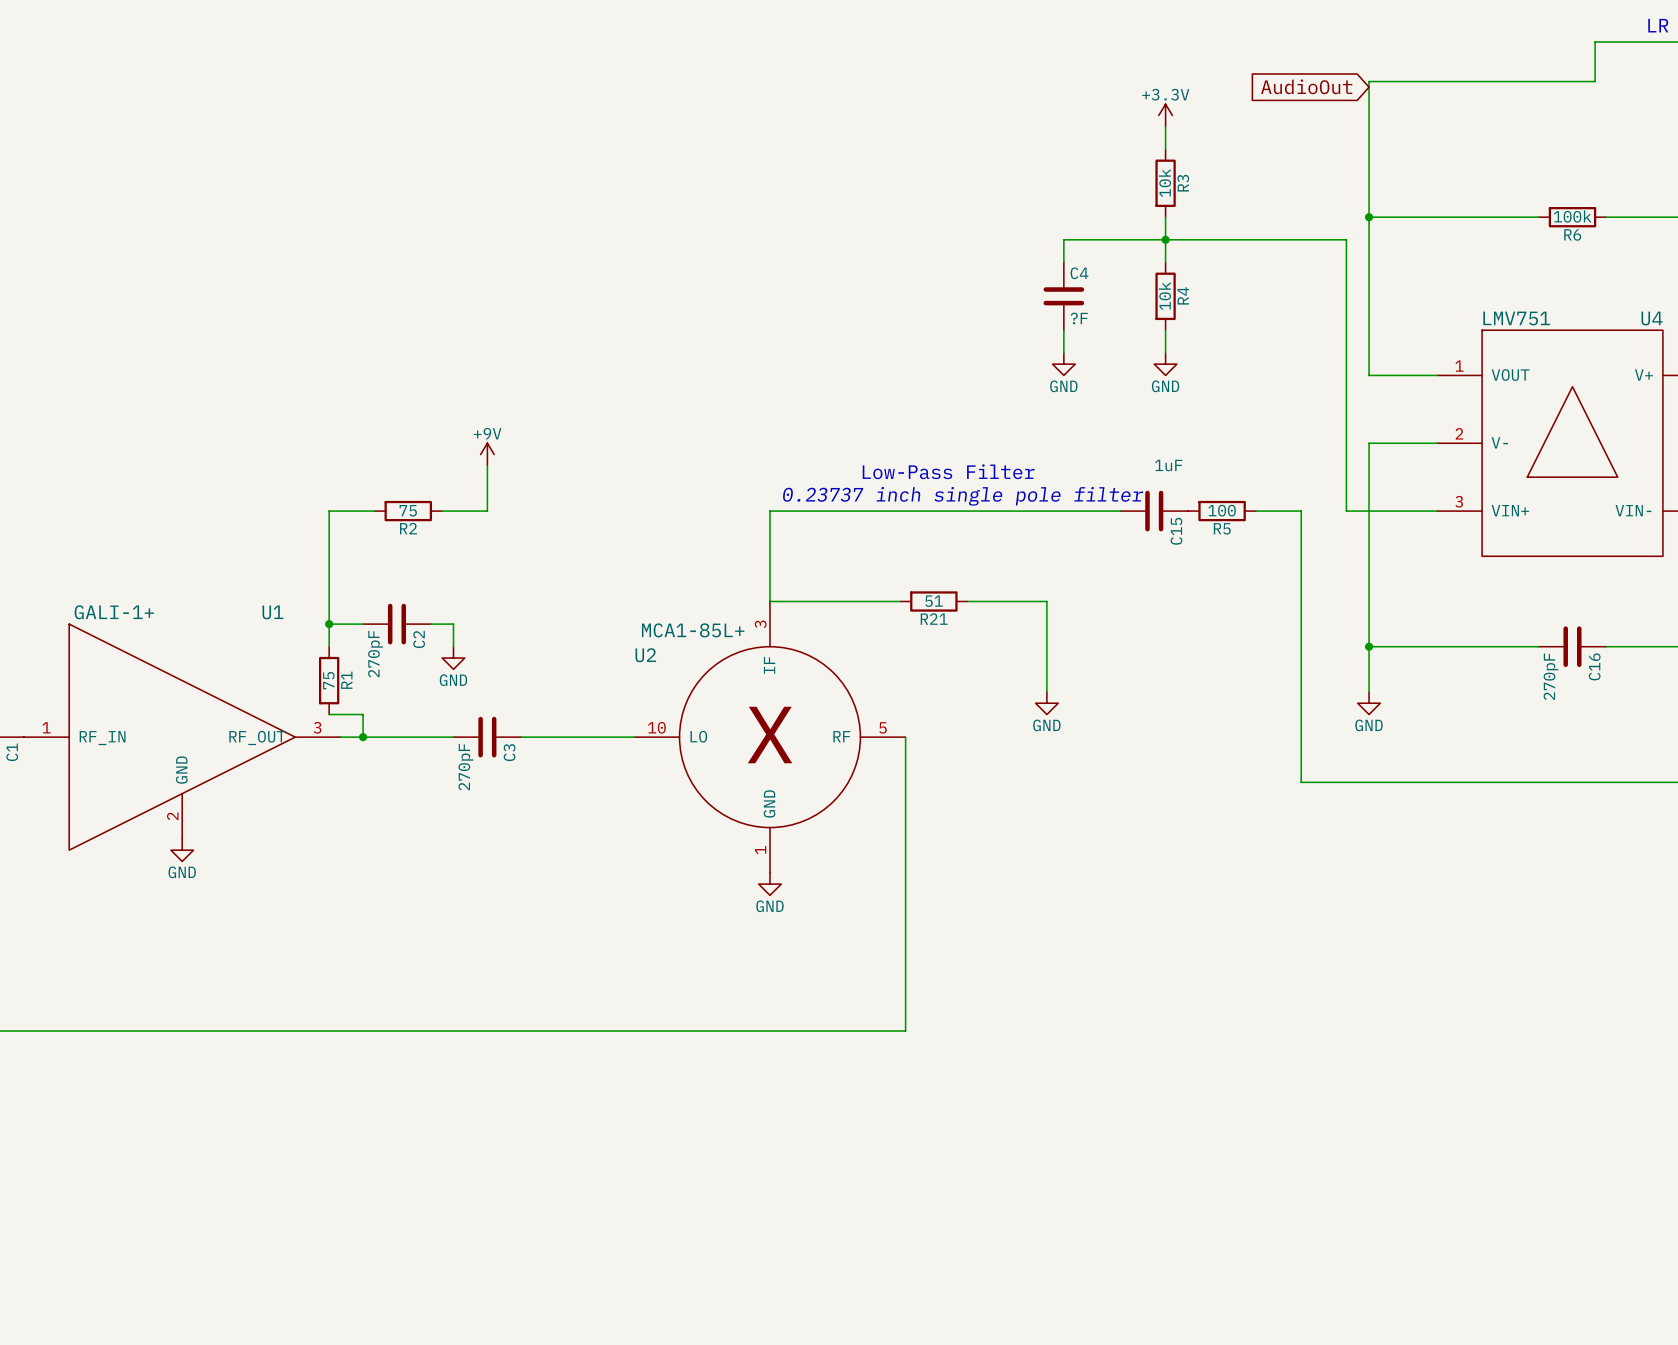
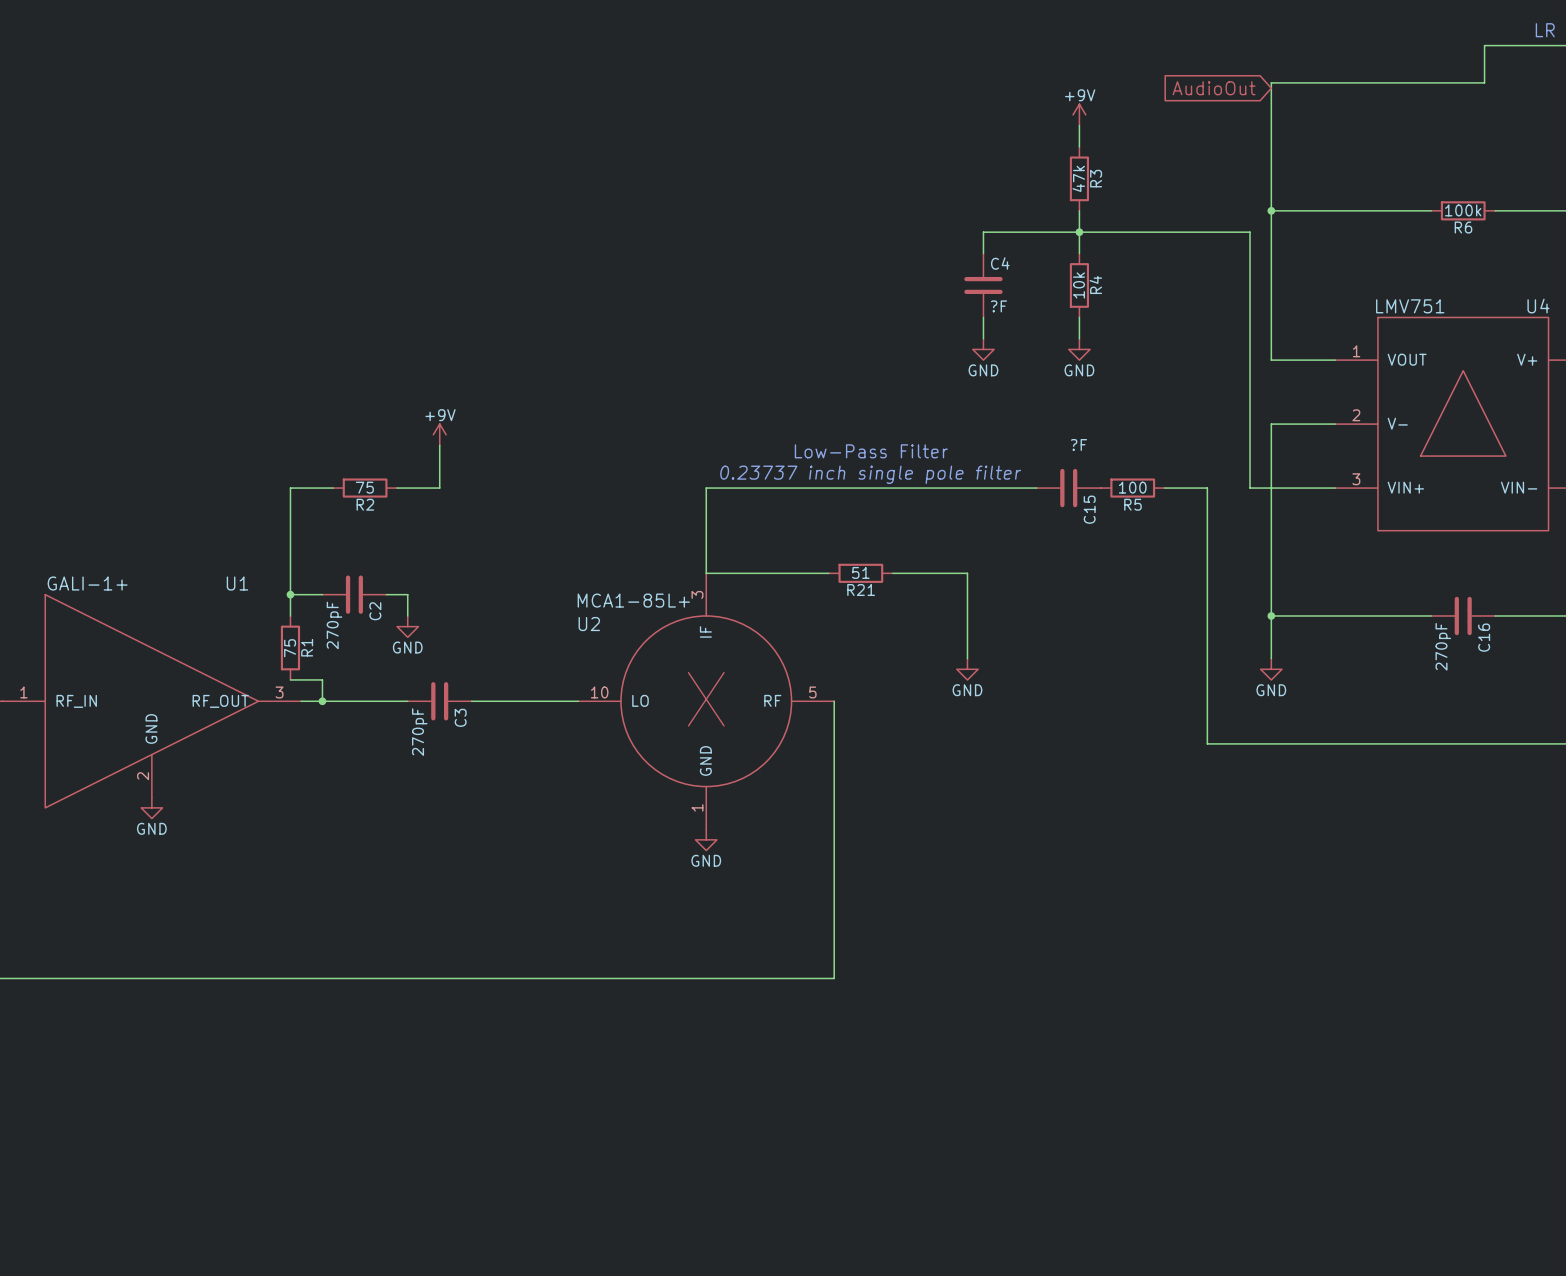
power symbol: +3.3V (1165, 115) -> +9V (1079, 114)
R3 value: 10k (1164, 183) -> 47k (1078, 178)
C15 value: 1uF (1168, 465) -> ?F (1078, 445)

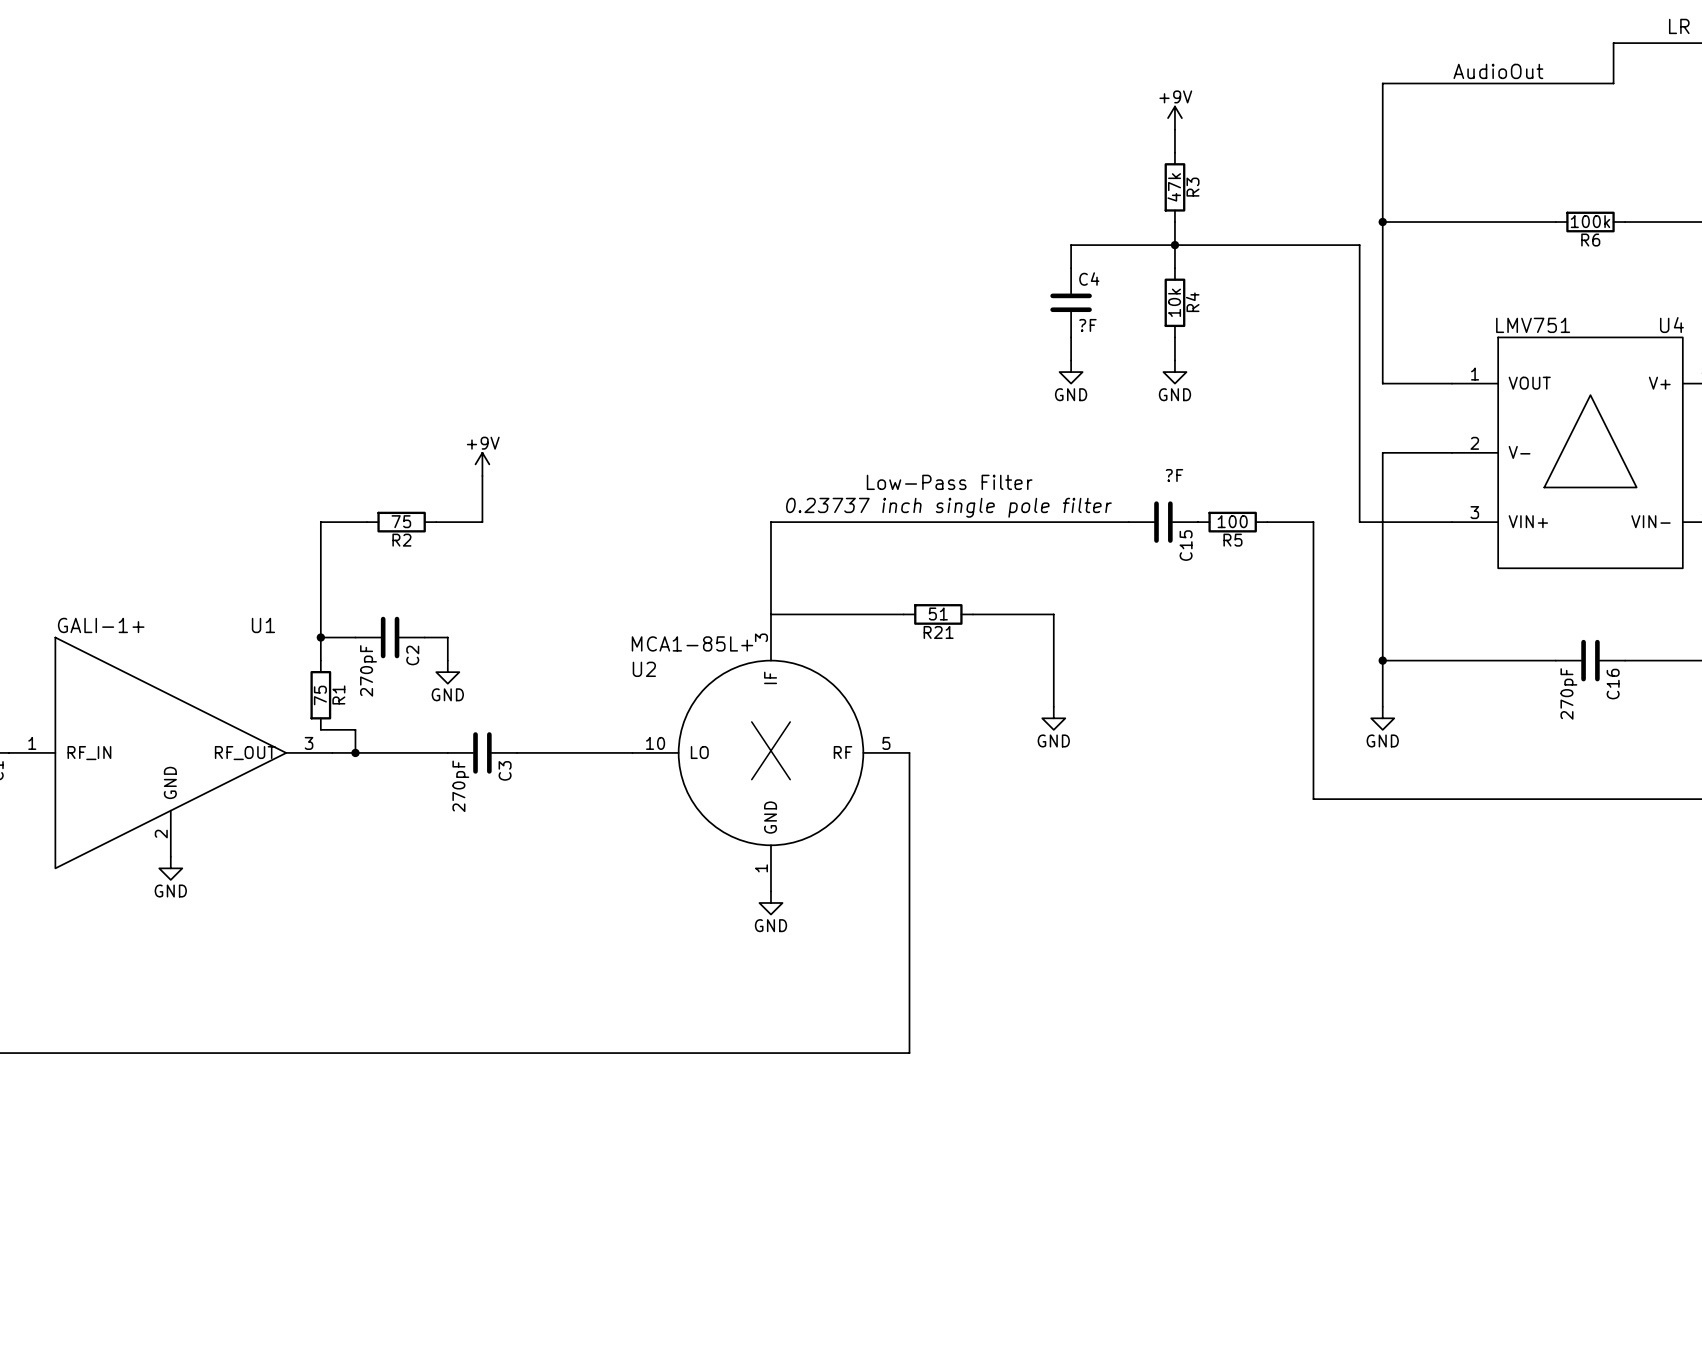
label: none -> AudioOut (1498, 71)
global label: AudioOut (1214, 88) -> none

